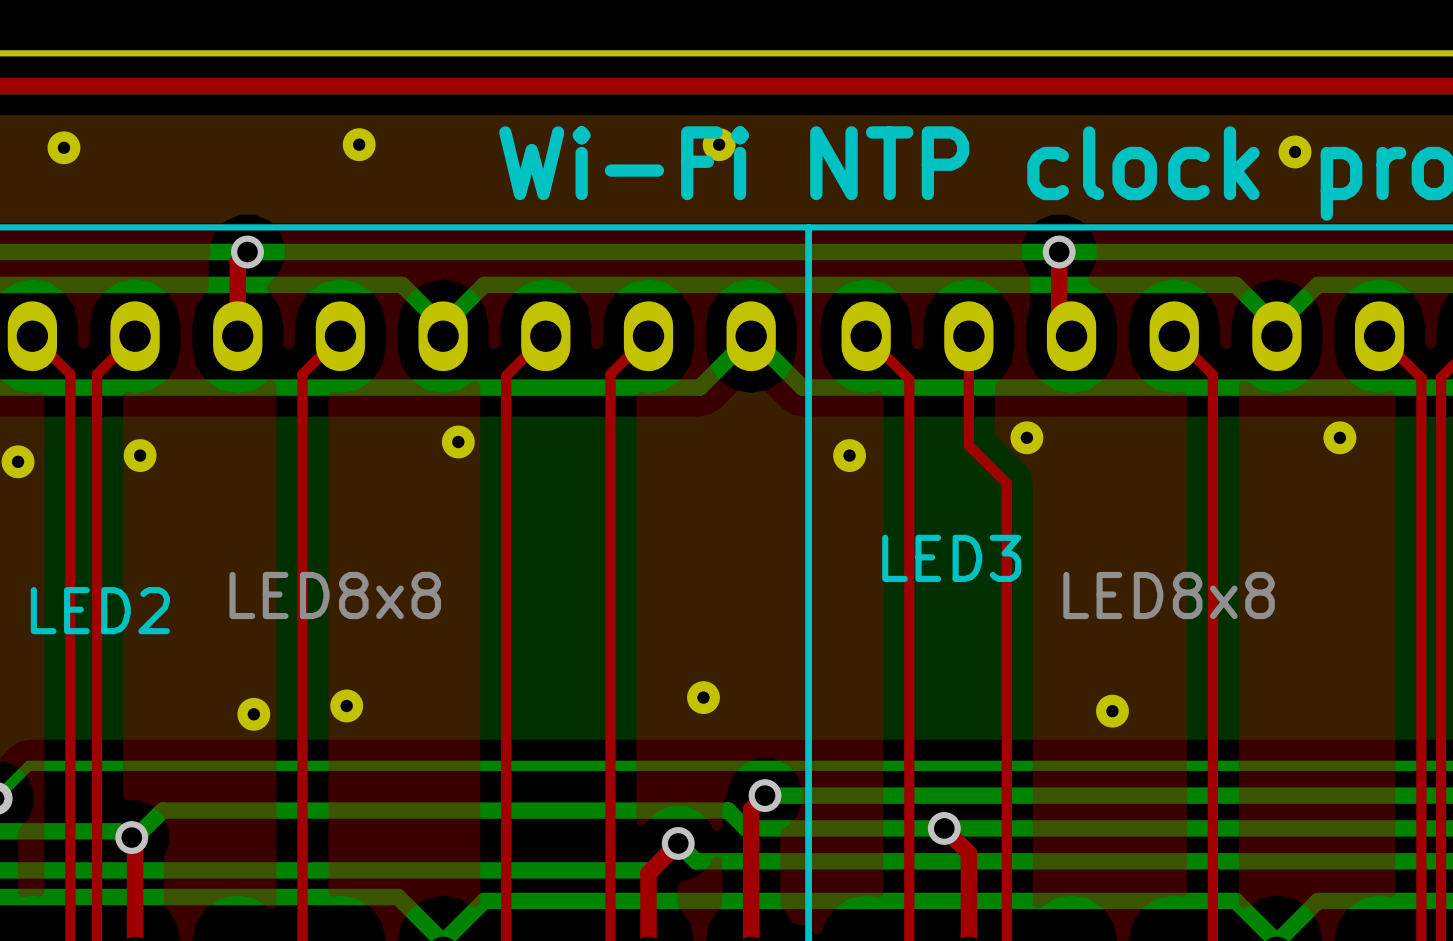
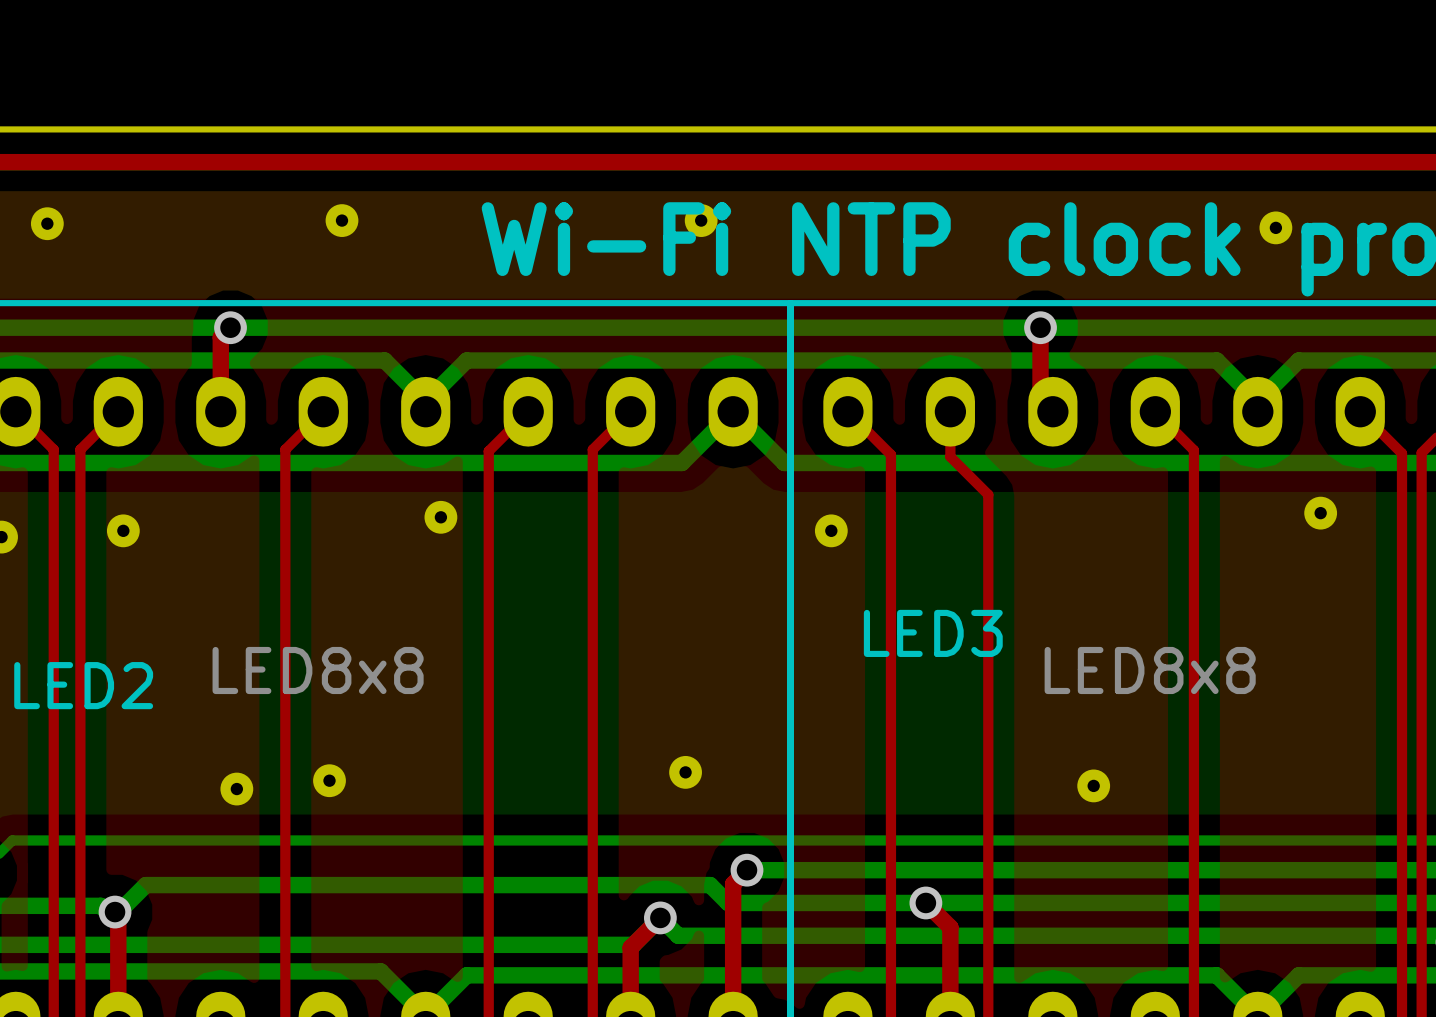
top track: (968, 381) (968, 445) (1006, 483) -> (950, 456) (988, 494) (988, 558)
part: (1026, 437) -> none

